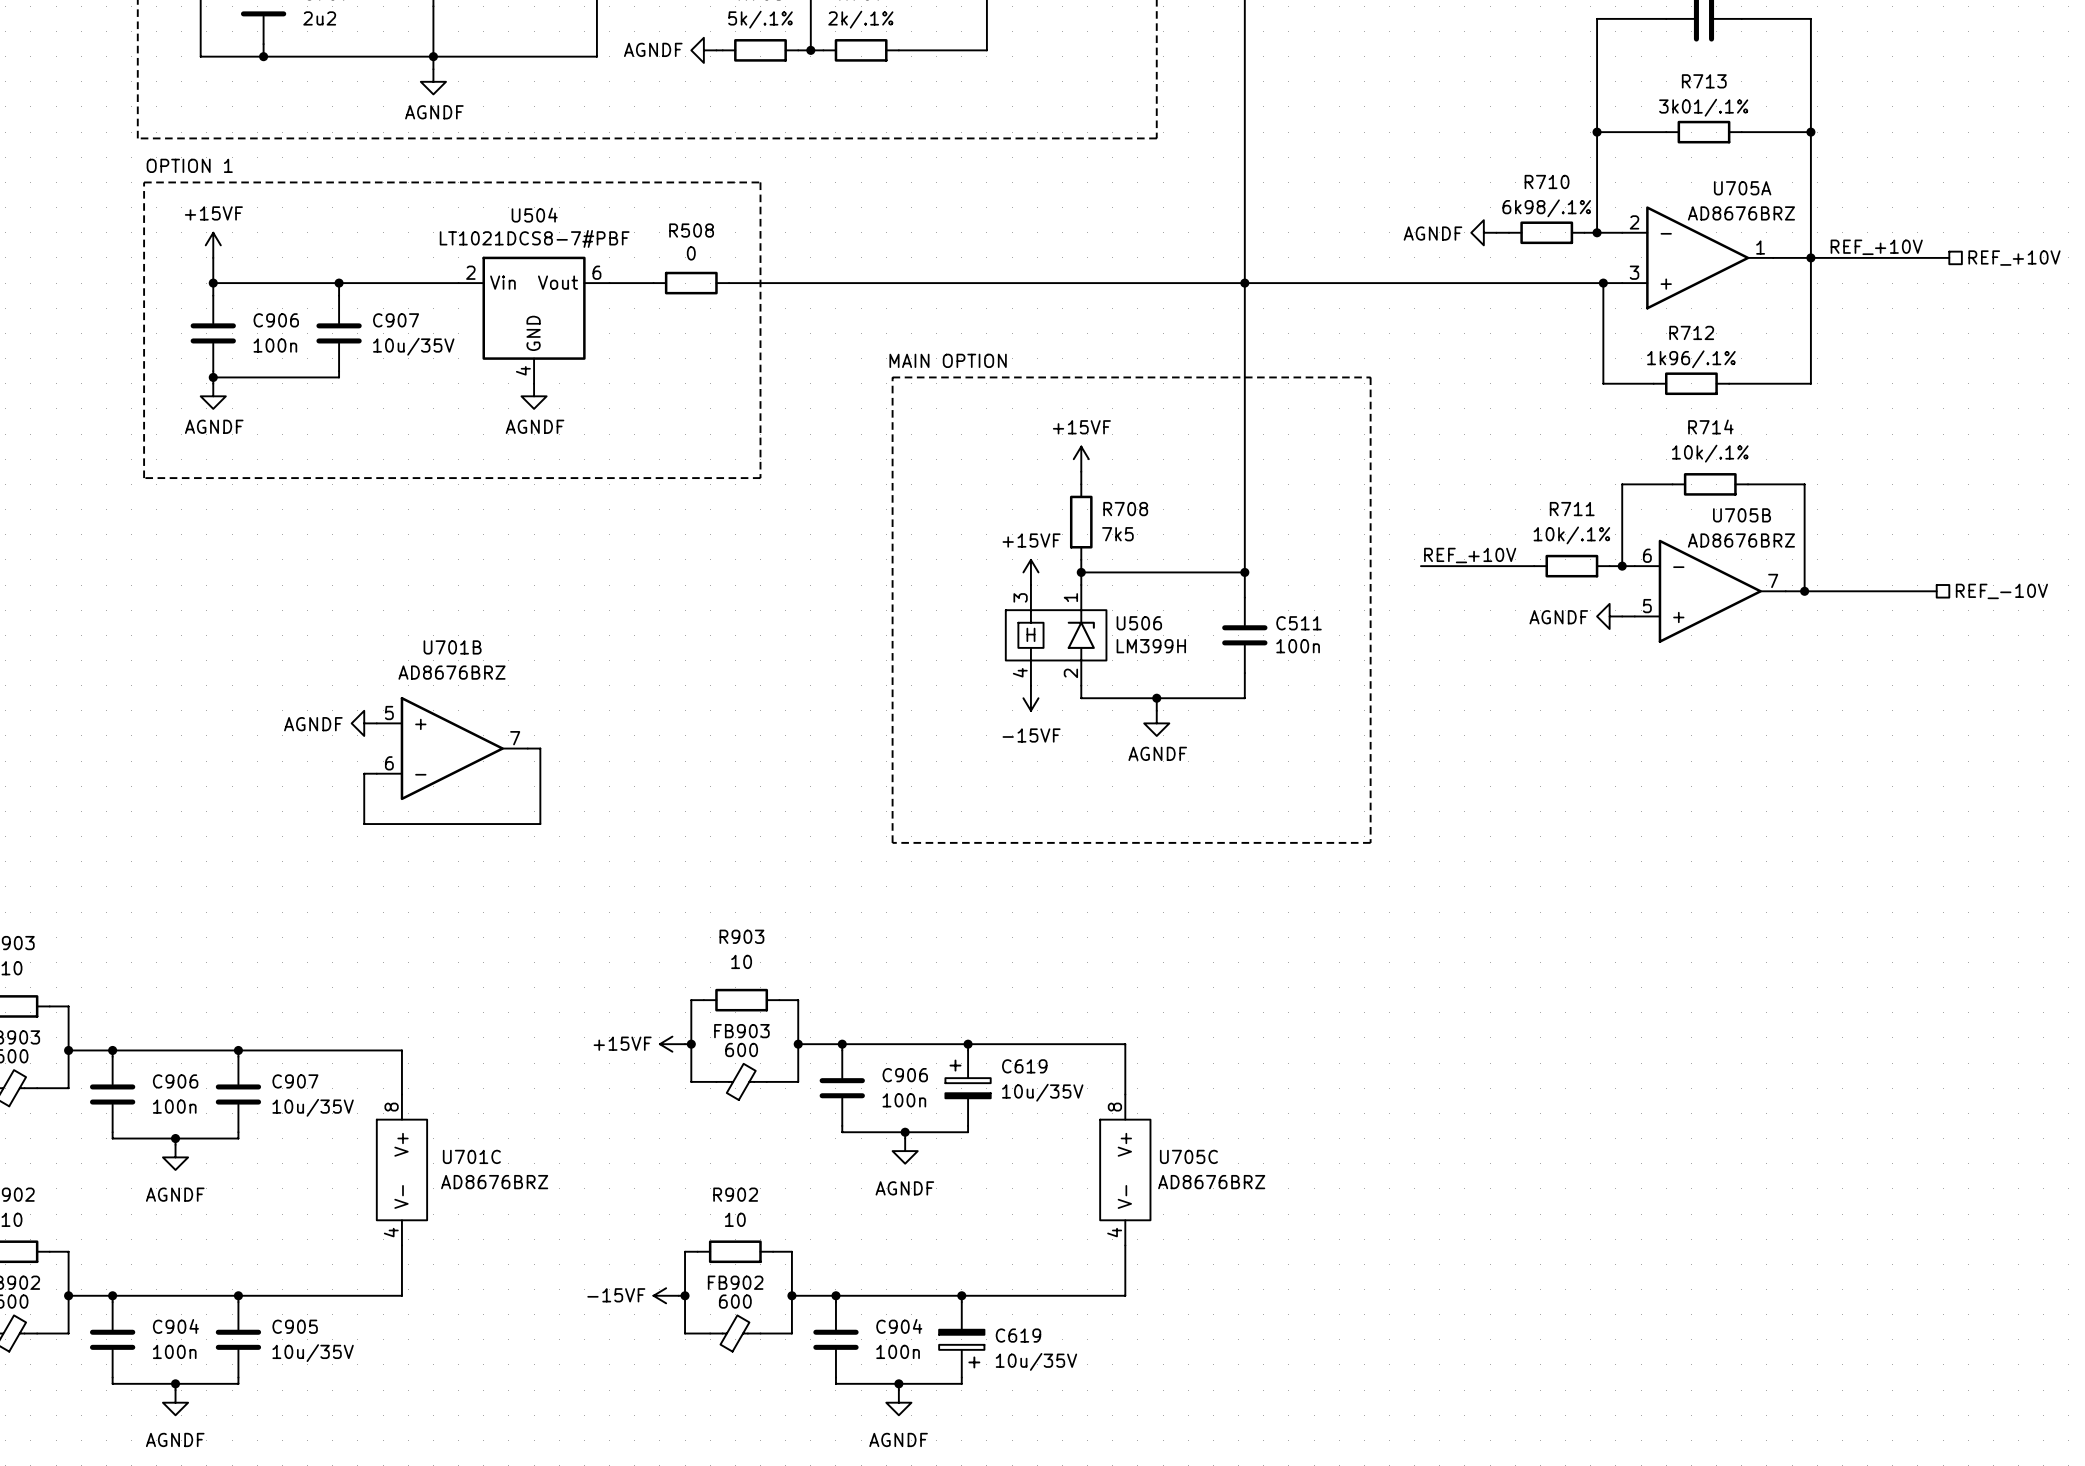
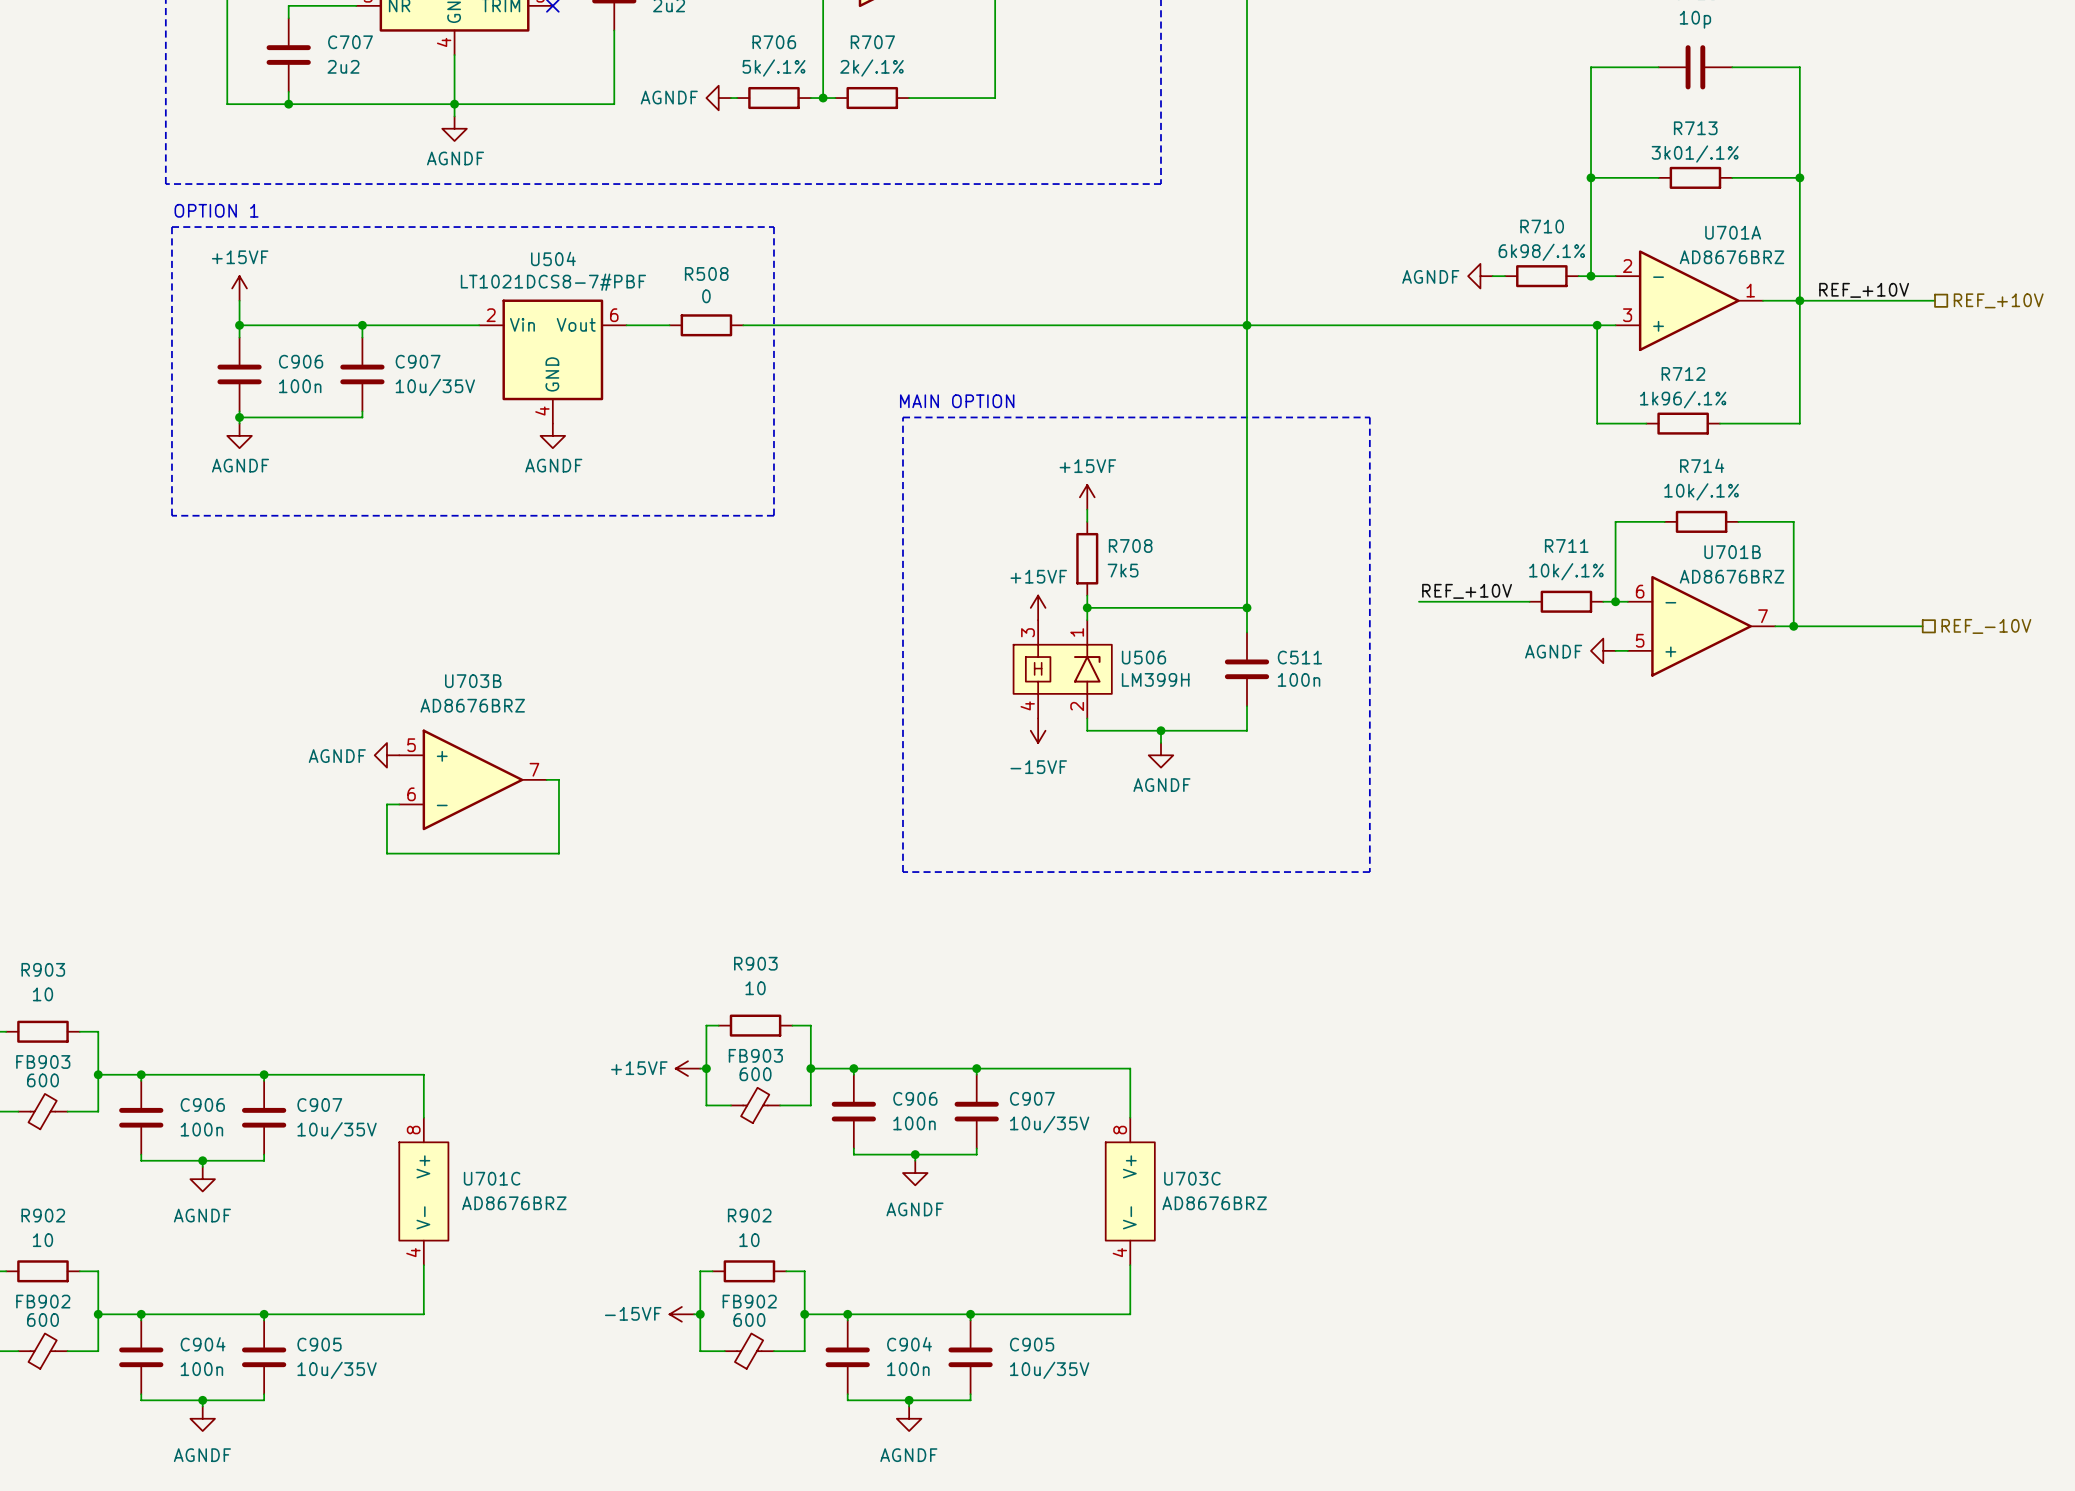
U705A name: U705A (1742, 188) -> U701A (1733, 232)
U705B name: U705B (1742, 515) -> U701B (1732, 552)
U701B name: U701B (452, 647) -> U703B (473, 681)
C619: 10u/35V (968, 1088) -> none
C907: none -> 10u/35V (976, 1111)
U705C name: U705C (1188, 1156) -> U703C (1192, 1178)
C619: 10u/35V (961, 1339) -> none
C905: none -> 10u/35V (970, 1357)

